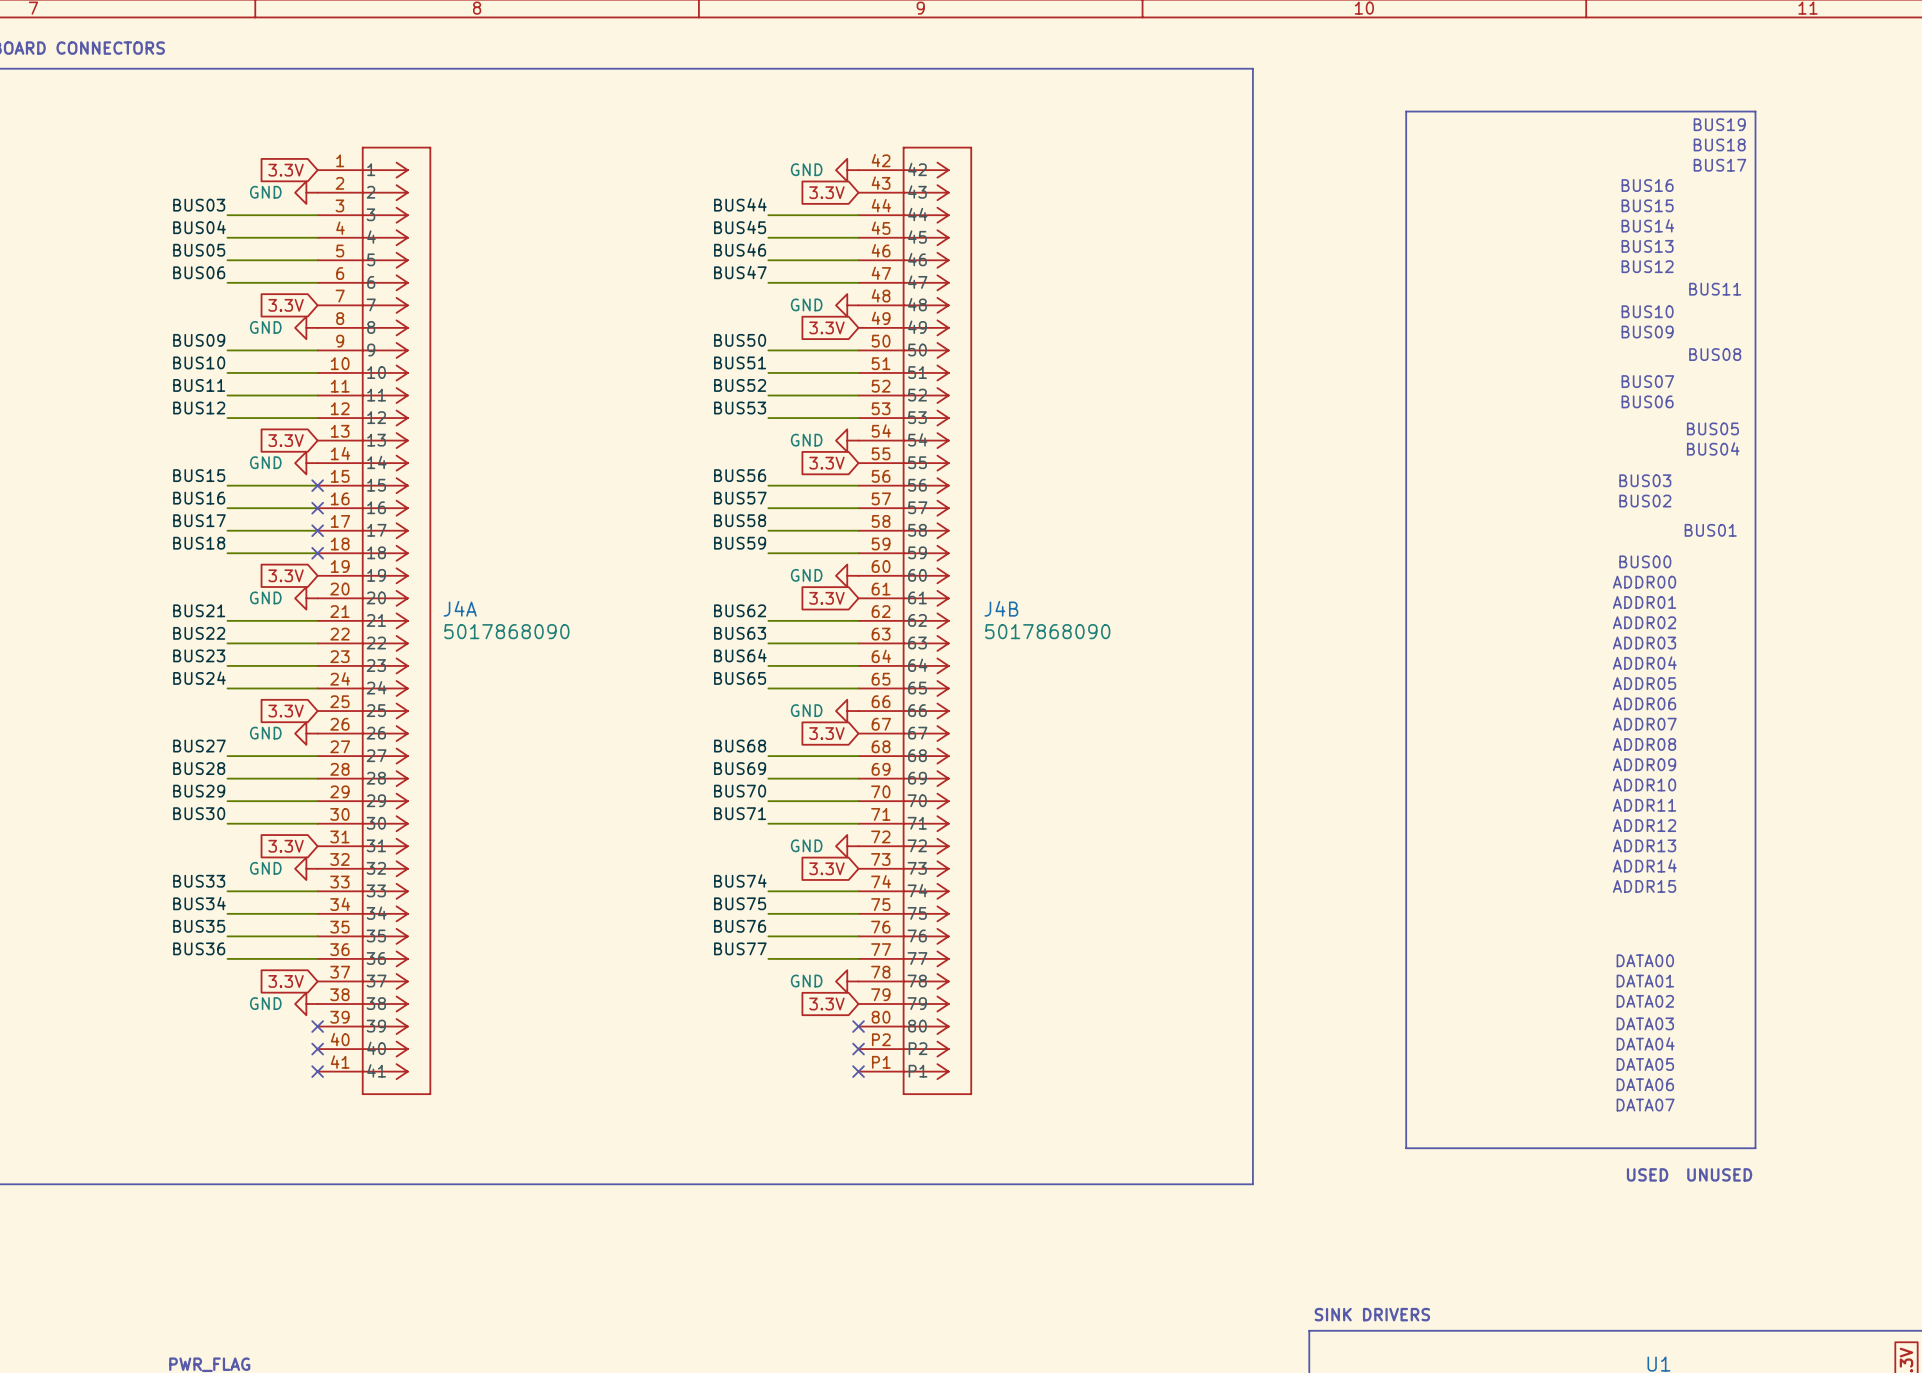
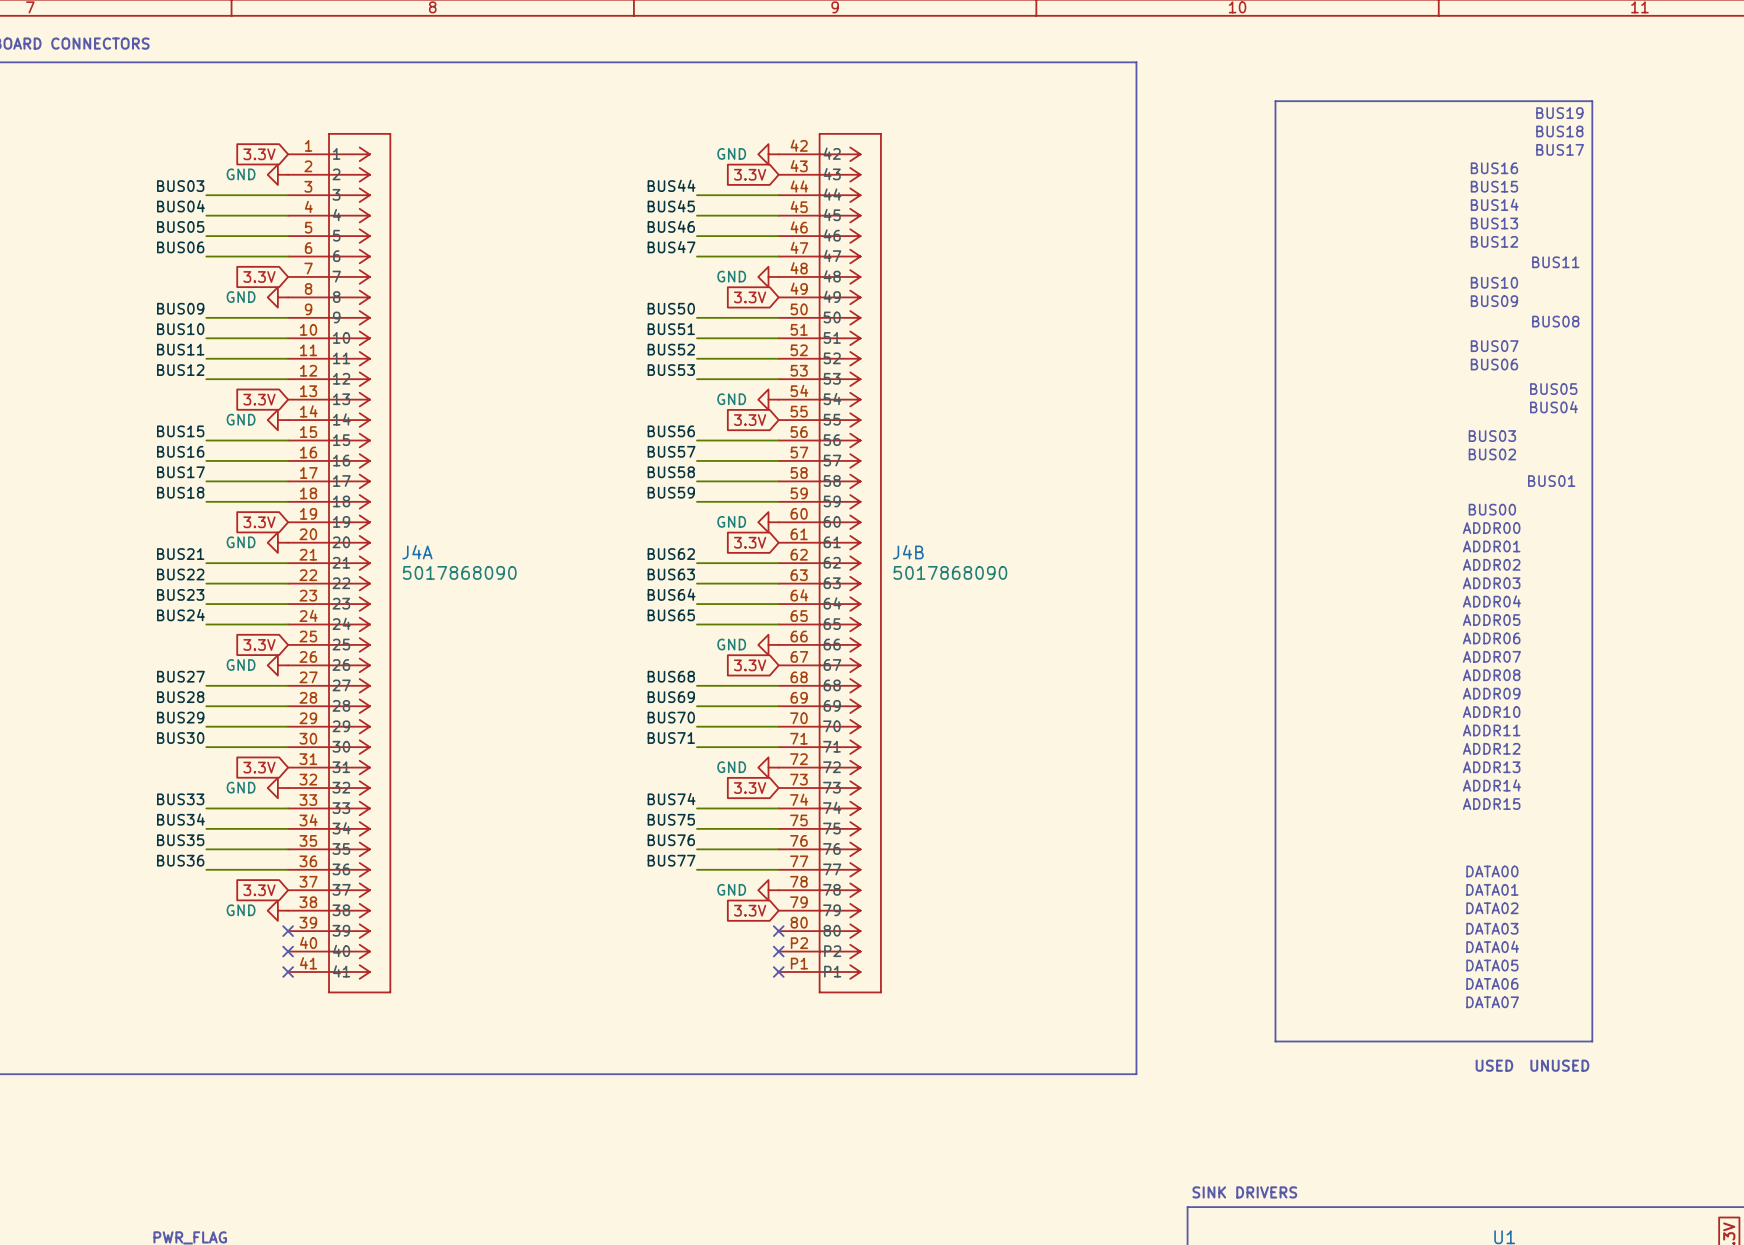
no-connect mark: (317, 485) -> none
no-connect mark: (317, 508) -> none
no-connect mark: (317, 530) -> none
no-connect mark: (317, 553) -> none

